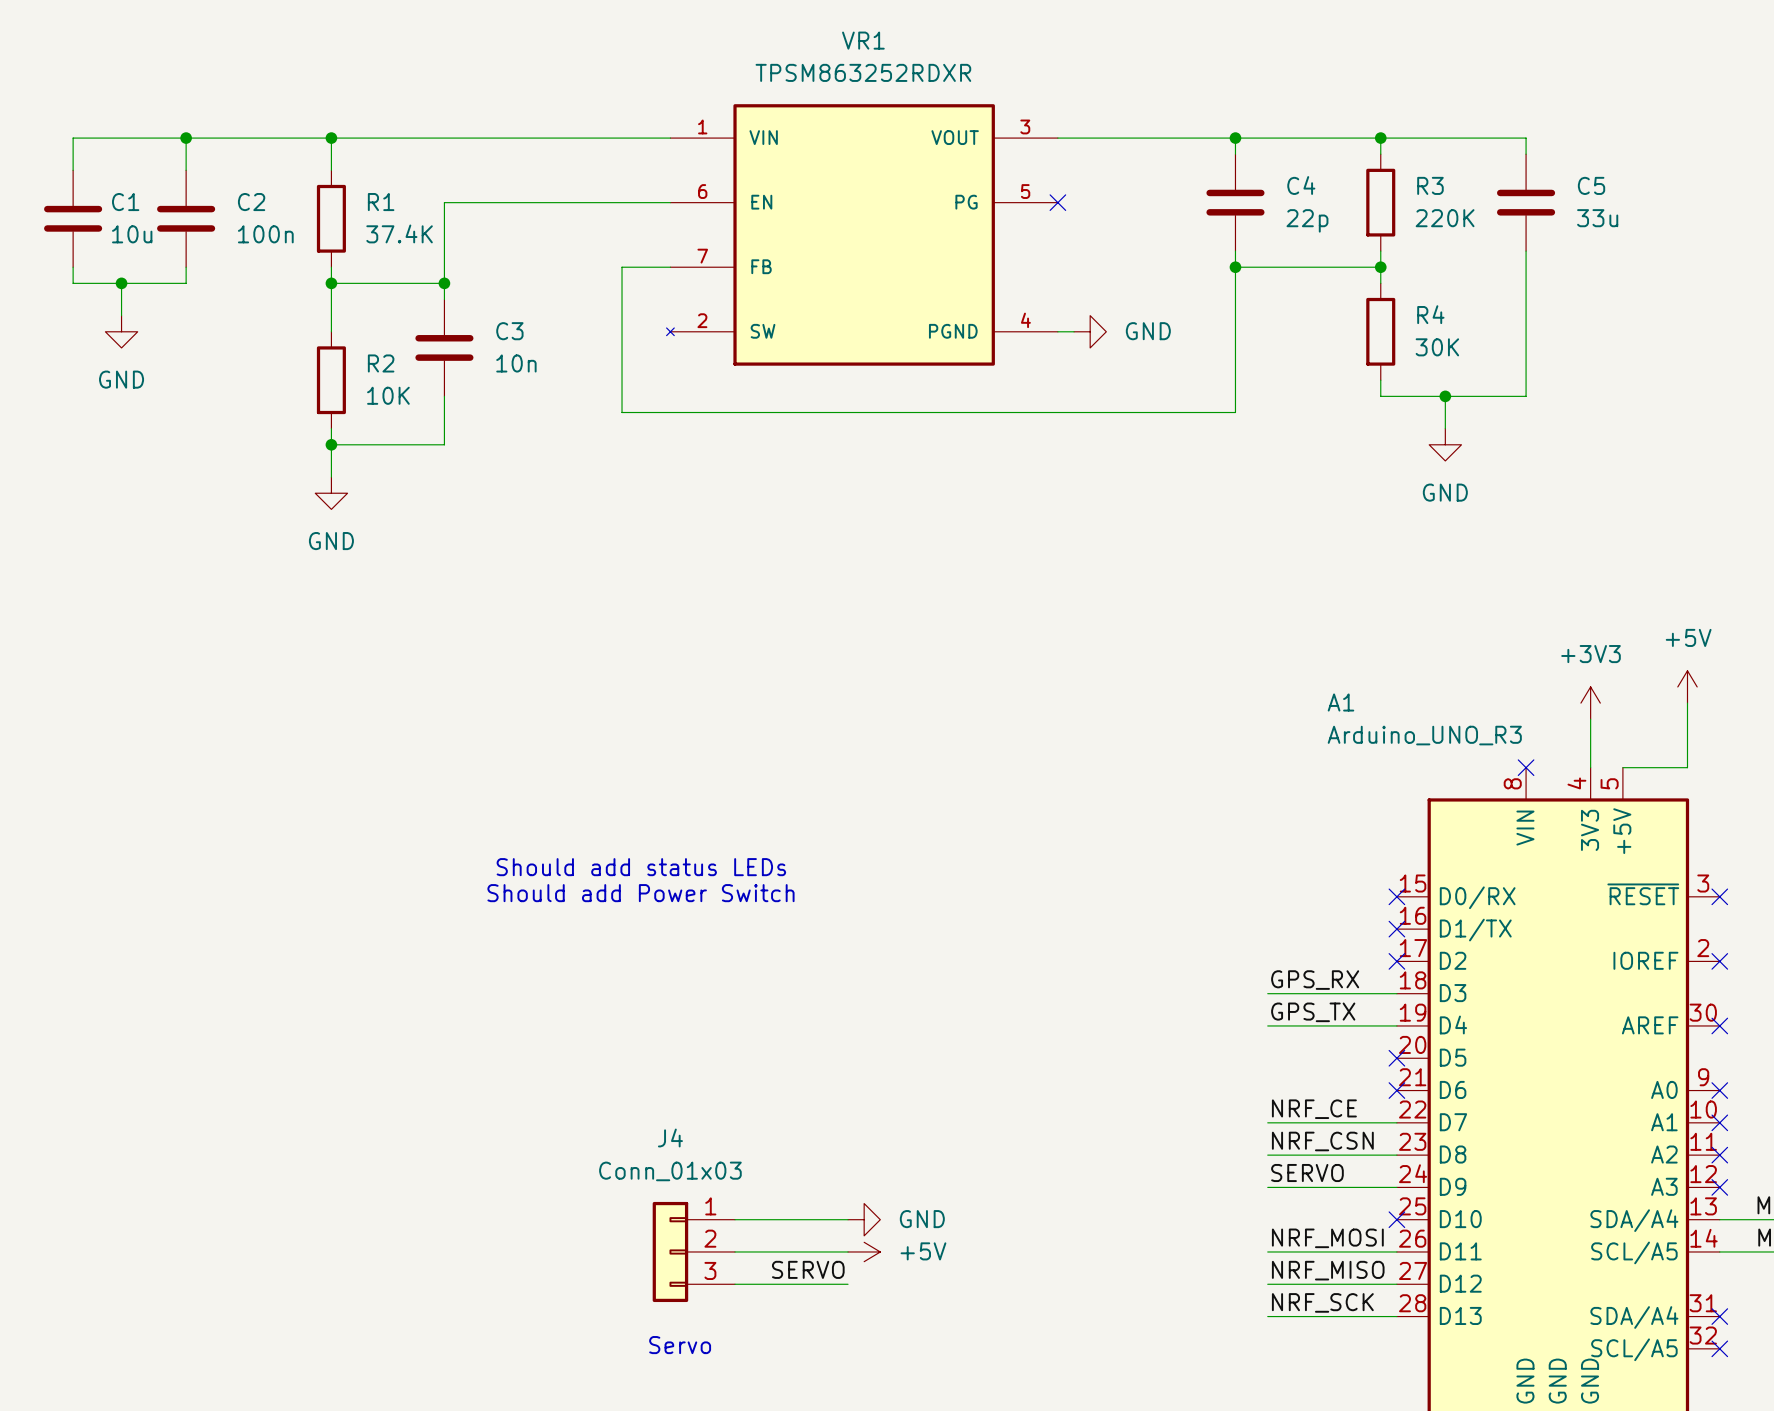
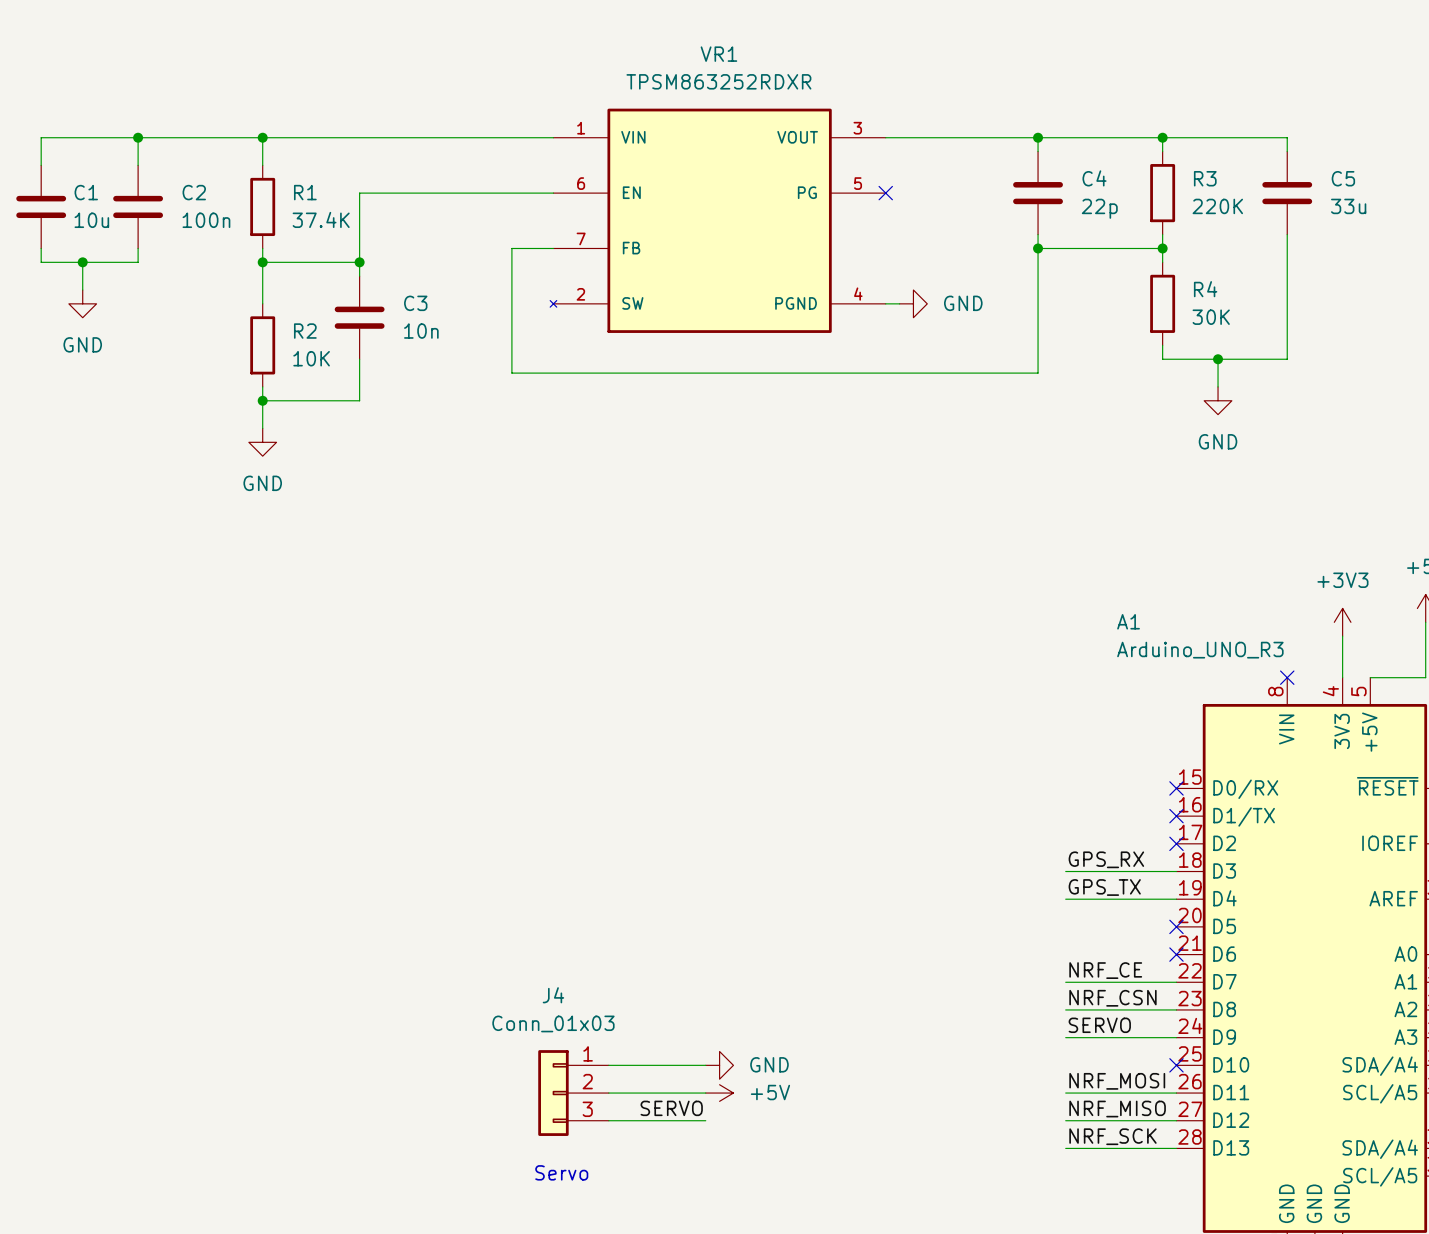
text: Should add status LEDs (641, 867) -> none
text: Should add Power Switch (640, 893) -> none

